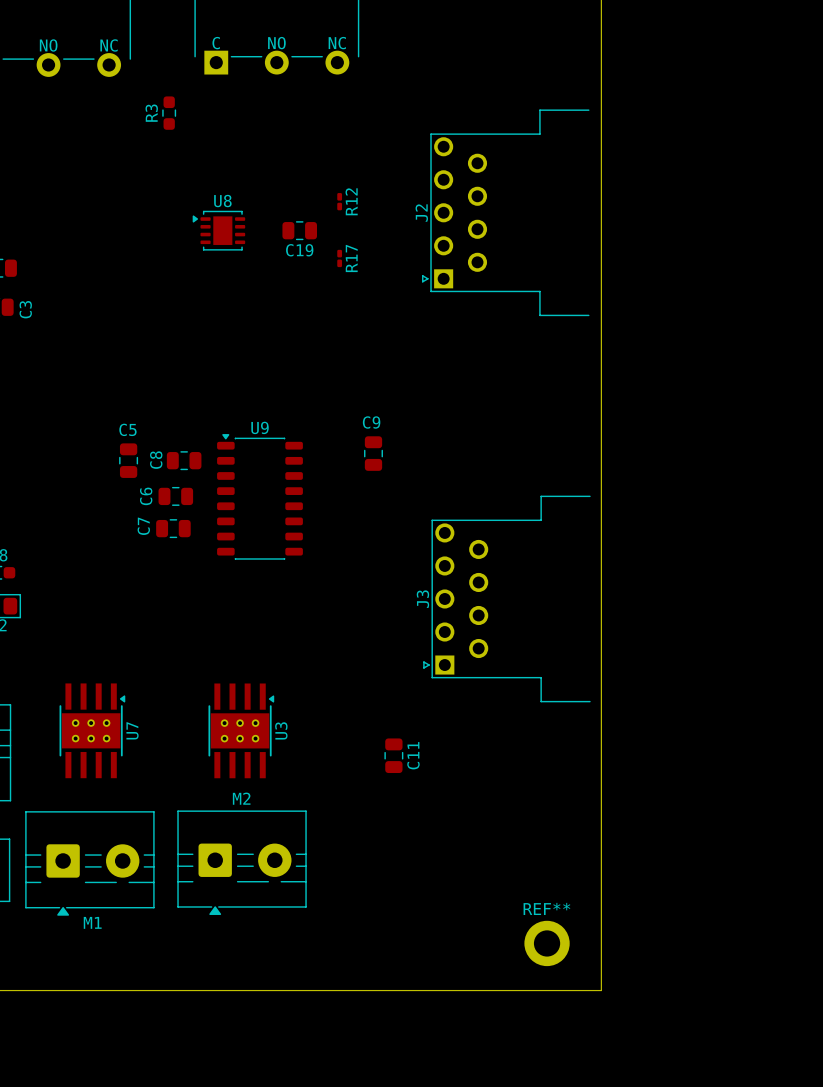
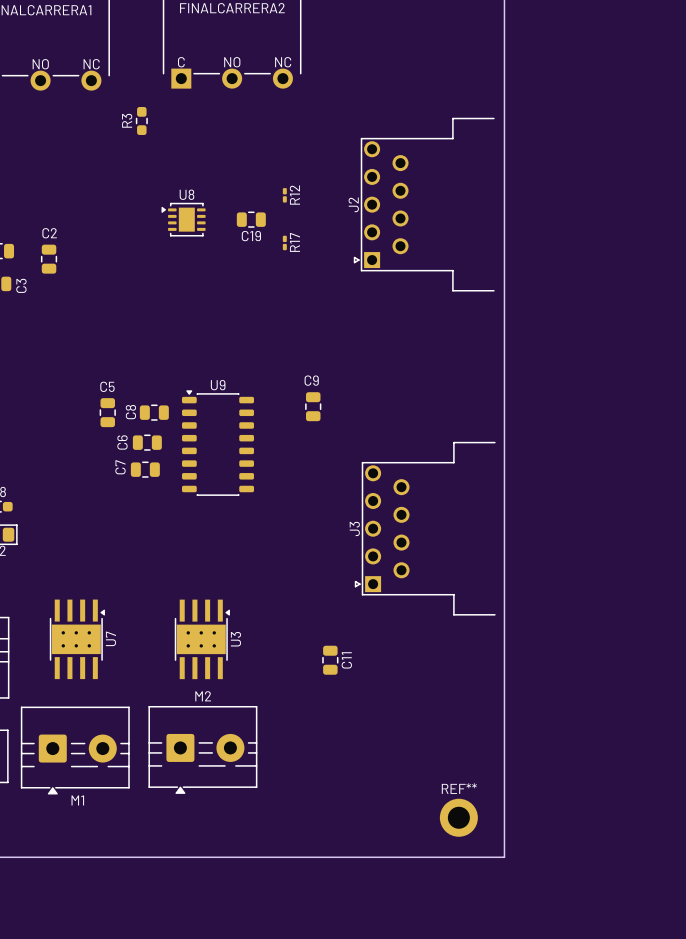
C2: none -> (49, 259)

